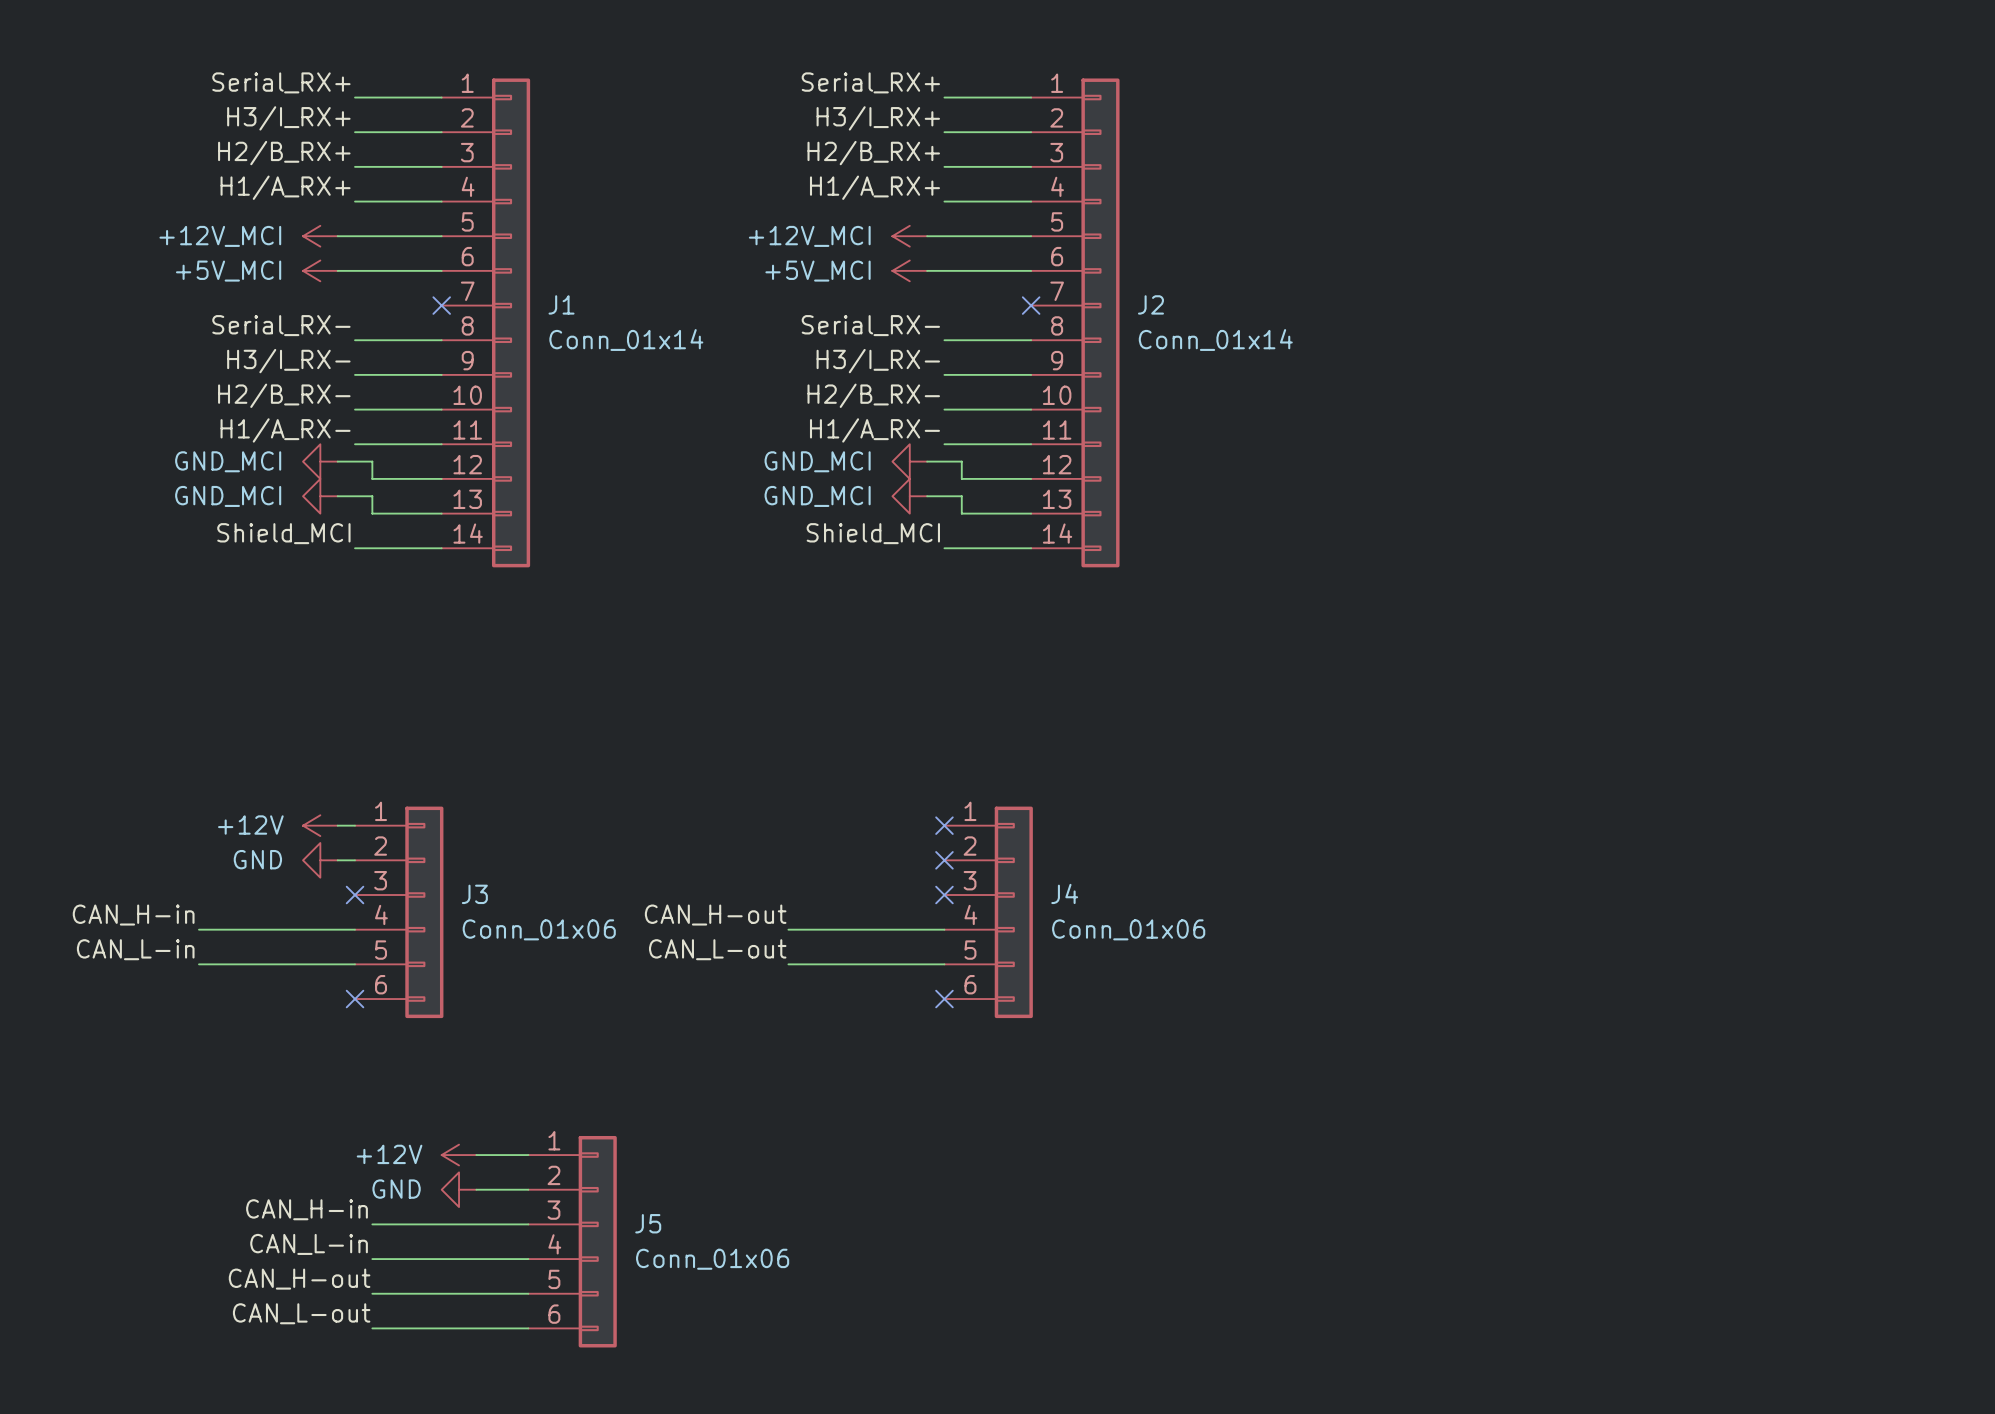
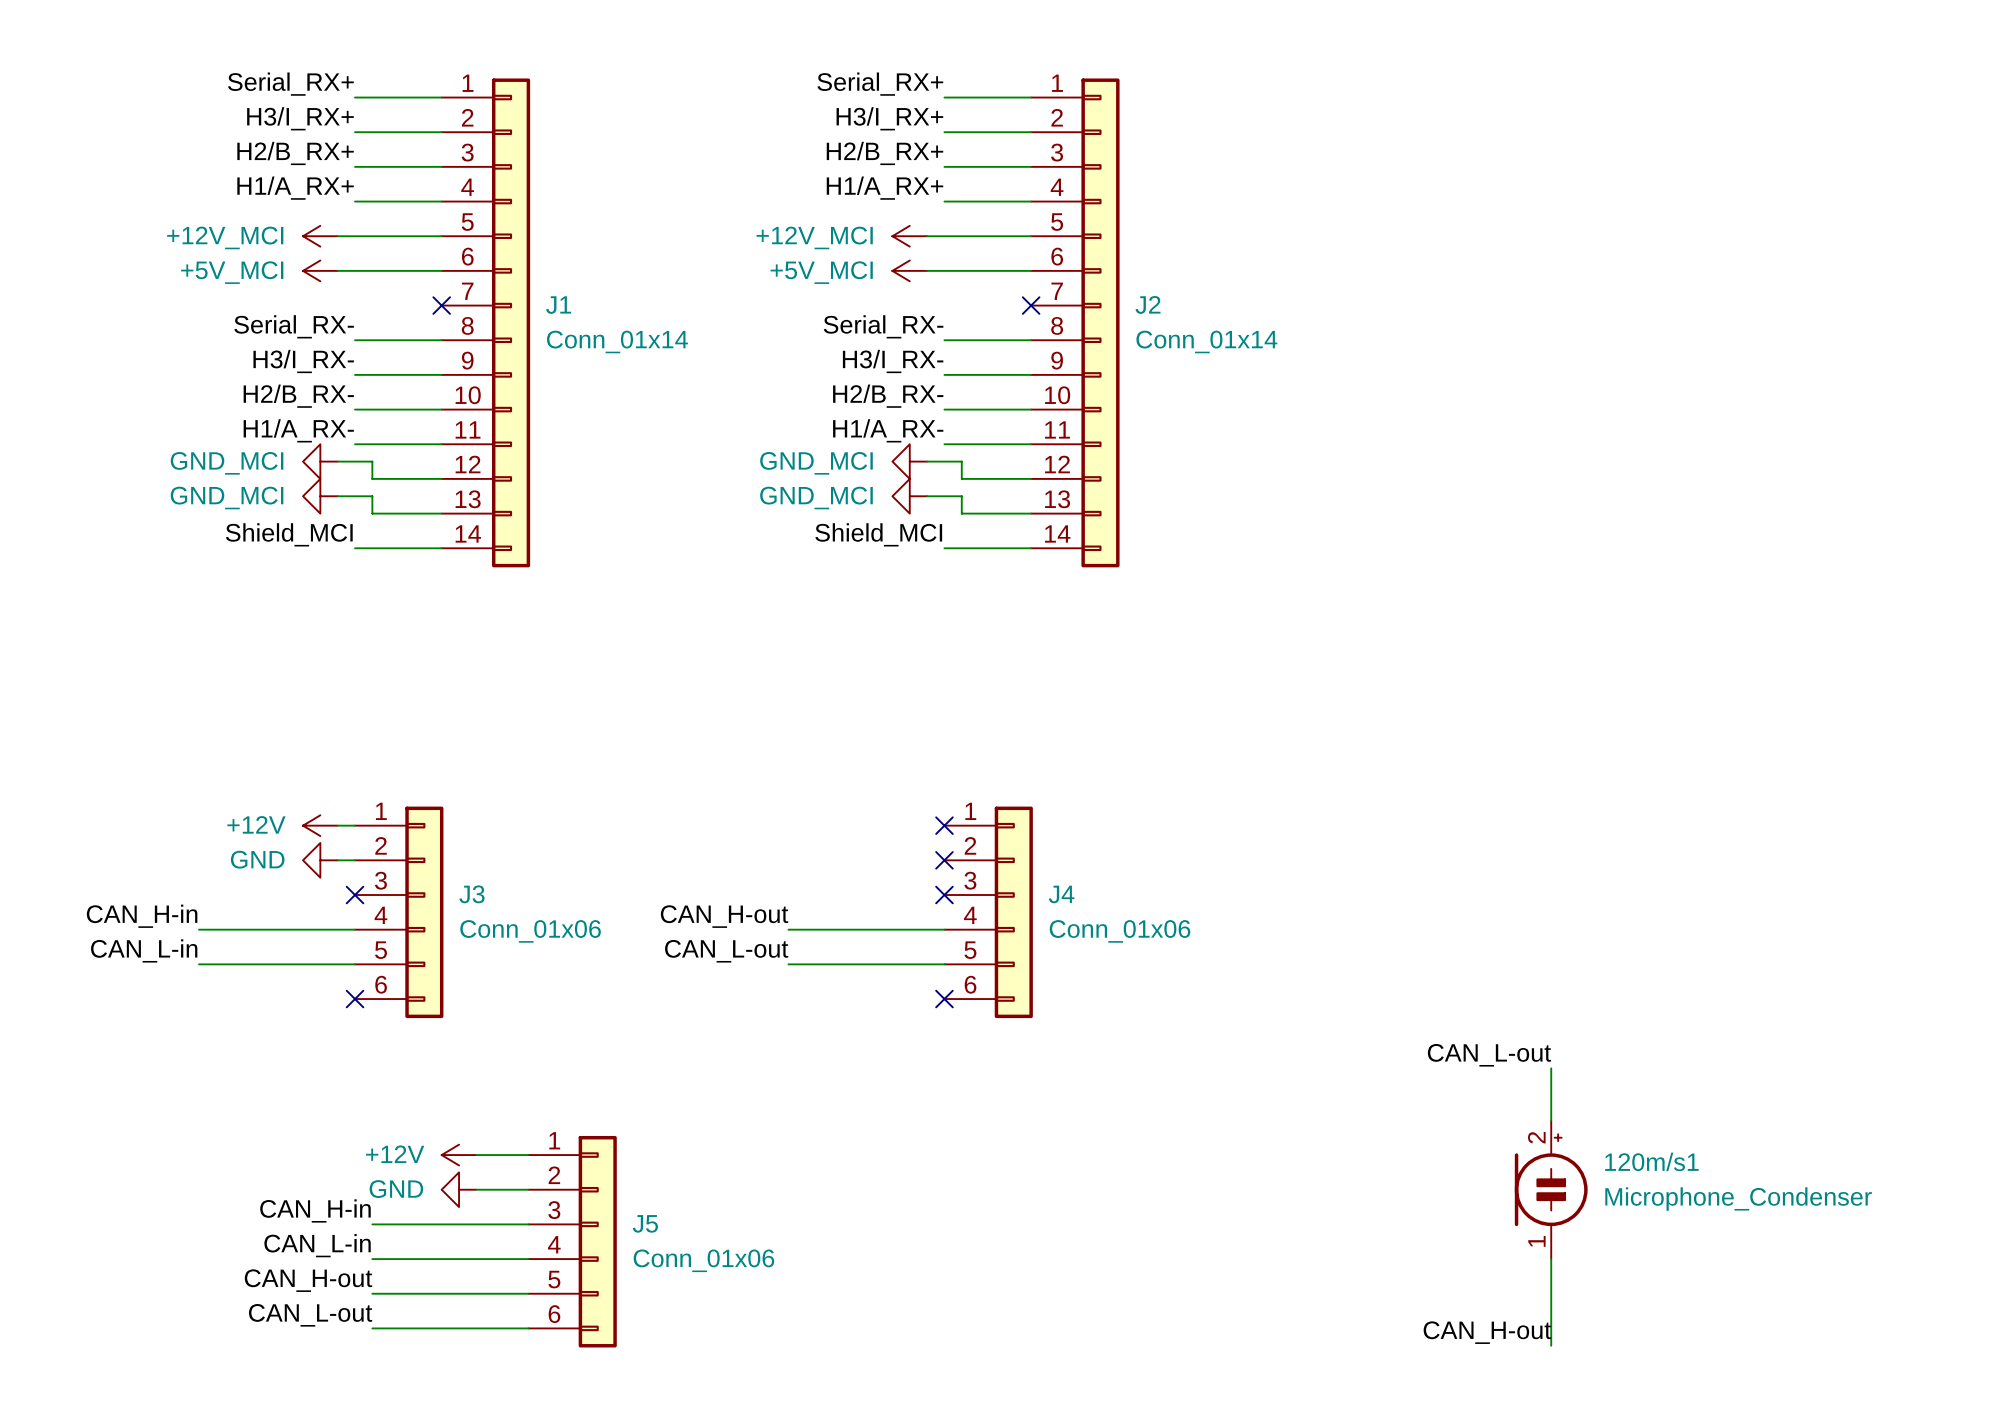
label: none -> CAN_L-out (1489, 1055)
wire: none -> (1551, 1068) (1551, 1120)
120m/s1: none -> Microphone_Condenser (1551, 1189)
wire: none -> (1551, 1259) (1551, 1345)
label: none -> CAN_H-out (1487, 1332)

